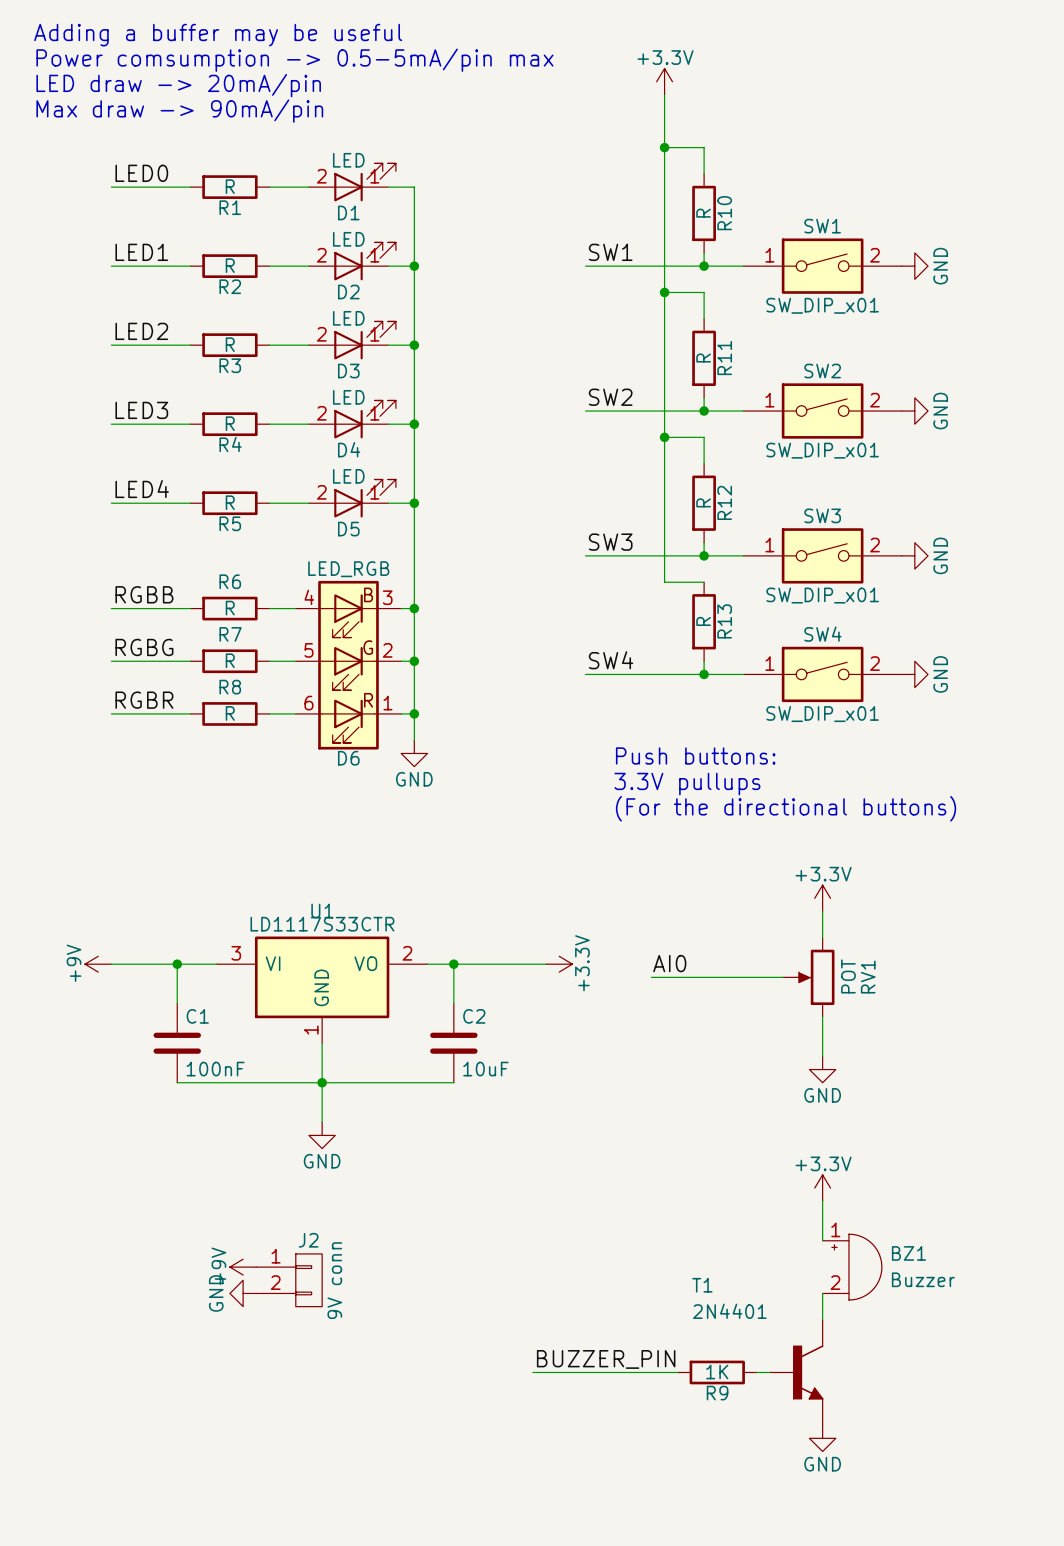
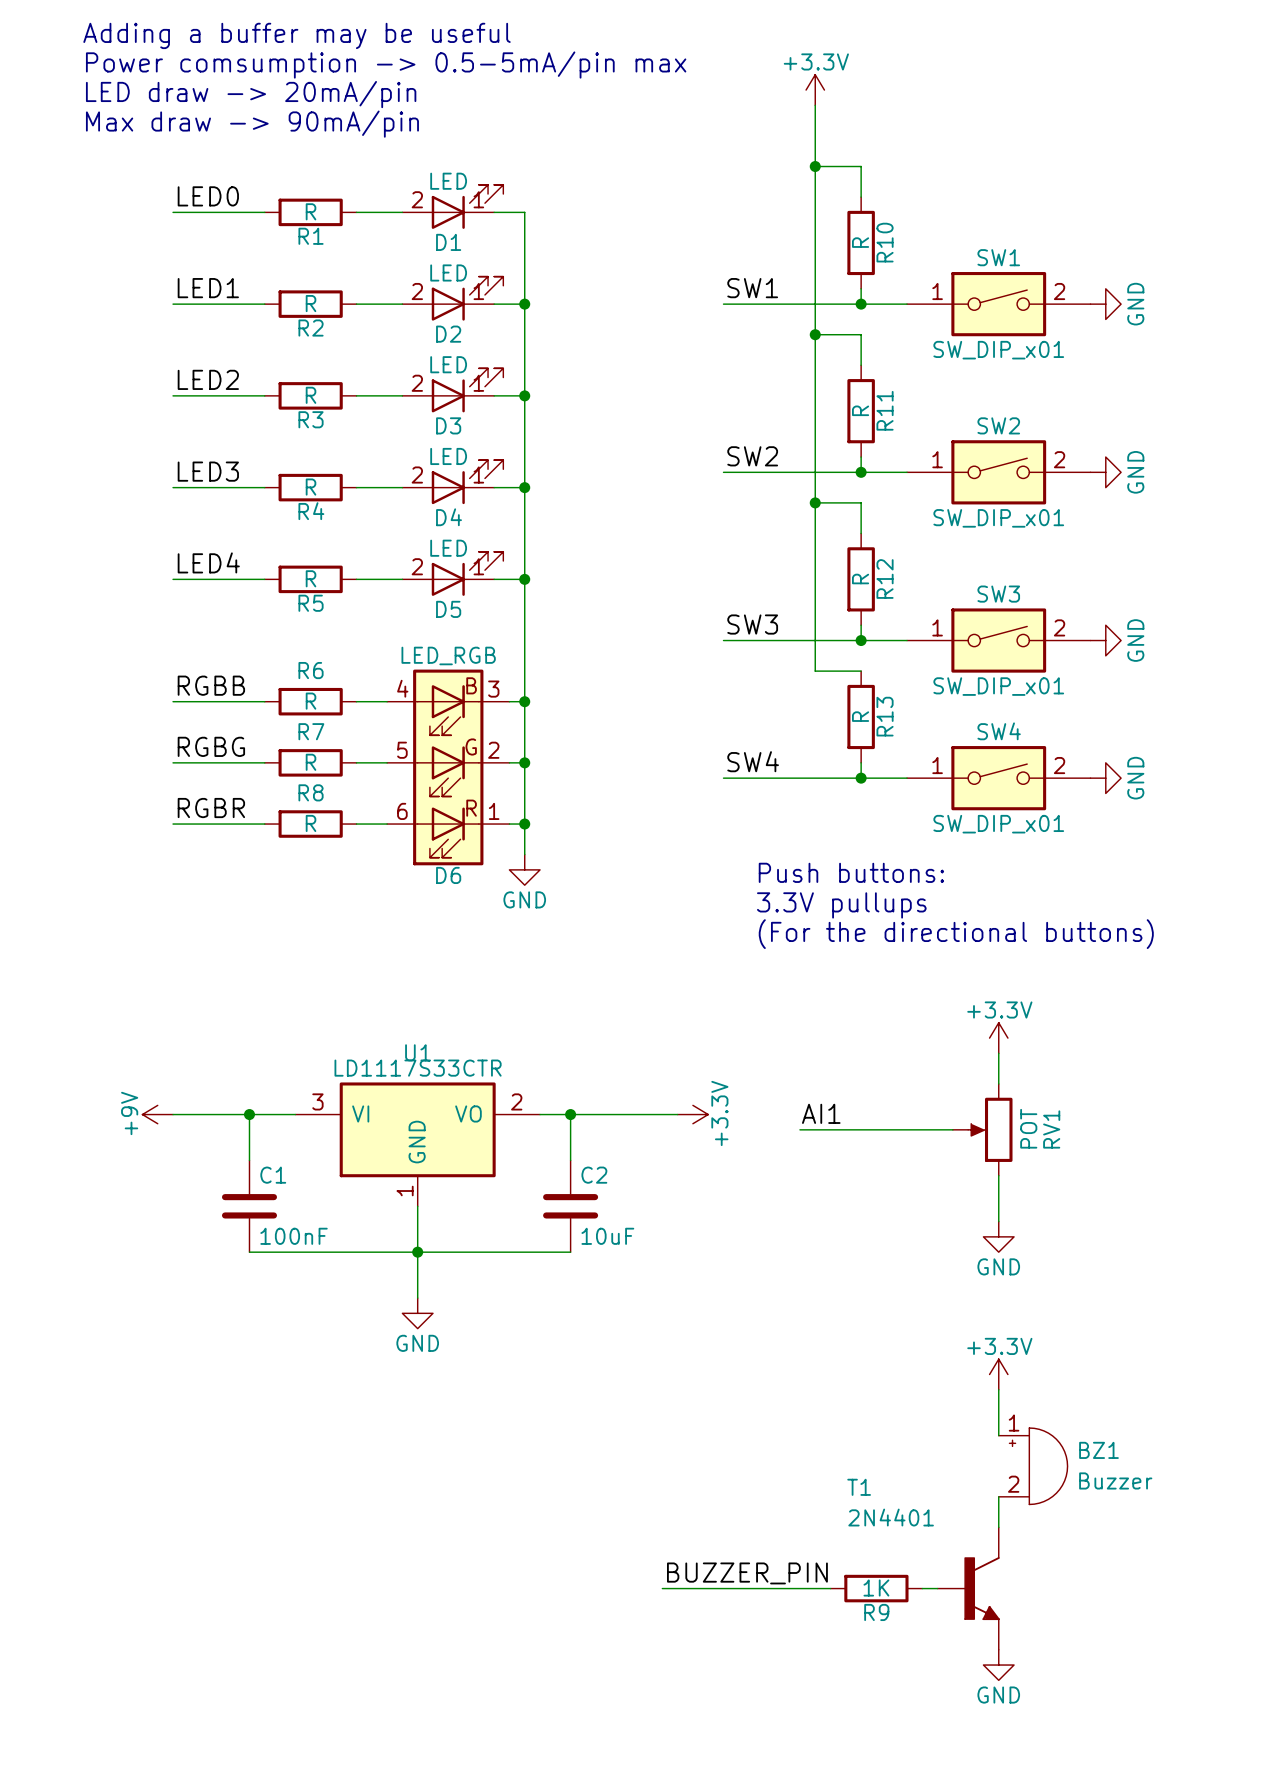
label: AI0 (669, 963) -> AI1 (821, 1113)
power symbol: +9V (243, 1267) -> none
J2: 9V conn (289, 1280) -> none
power symbol: GND (243, 1293) -> none

